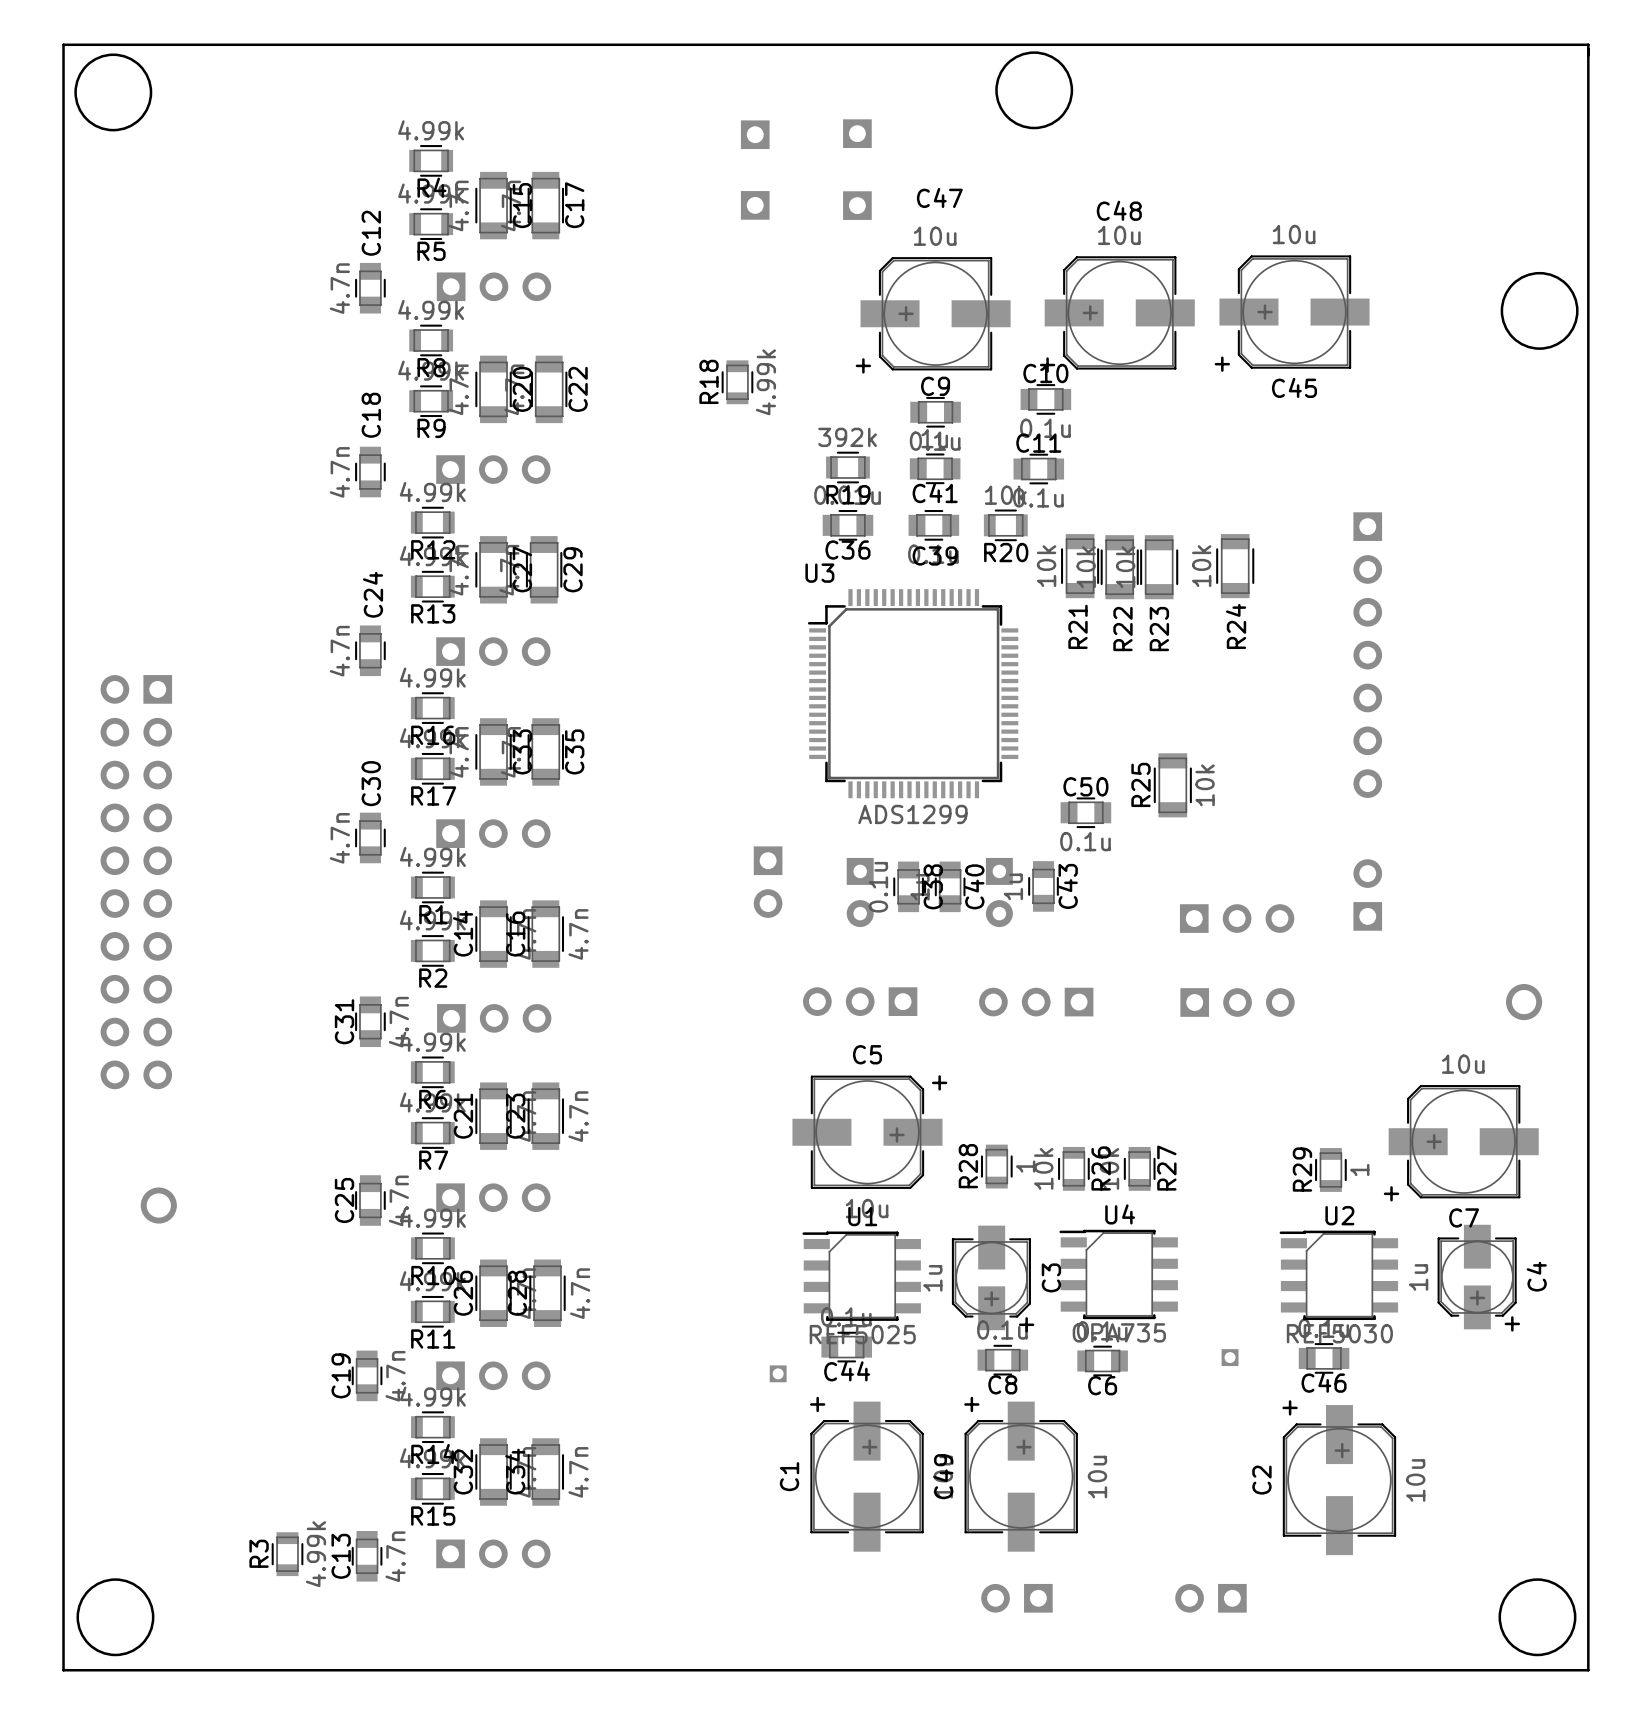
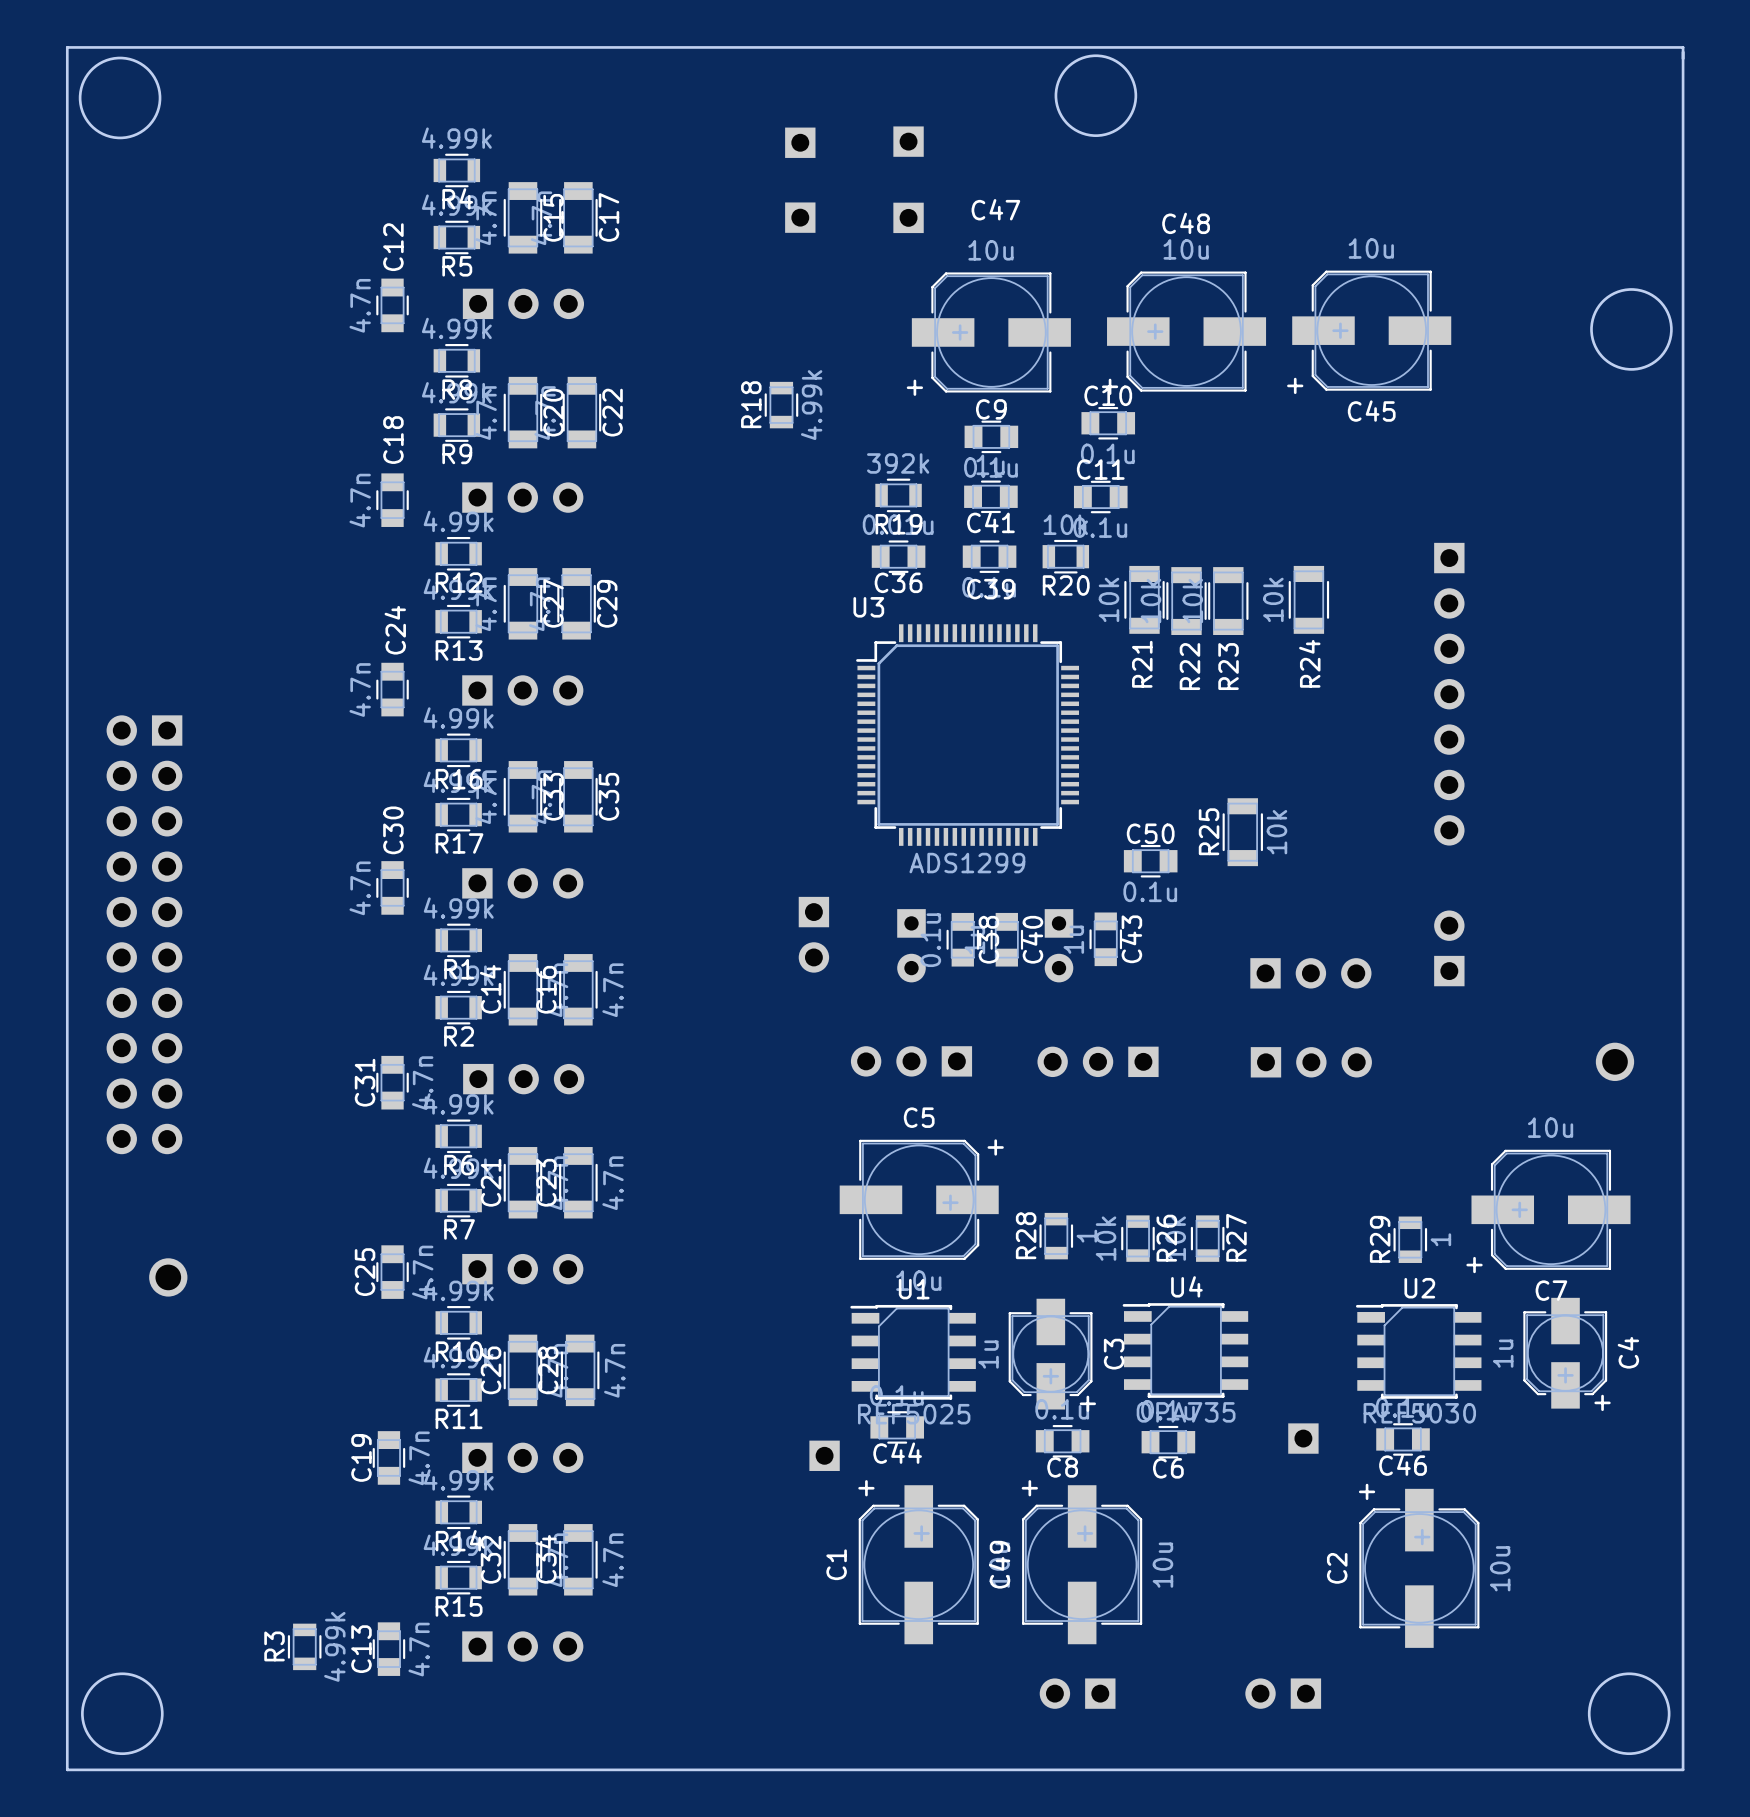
part footprint: [1221, 1349, 1239, 1367] -> [1288, 1423, 1319, 1454]
part footprint: [769, 1365, 787, 1383] -> [809, 1440, 840, 1471]

